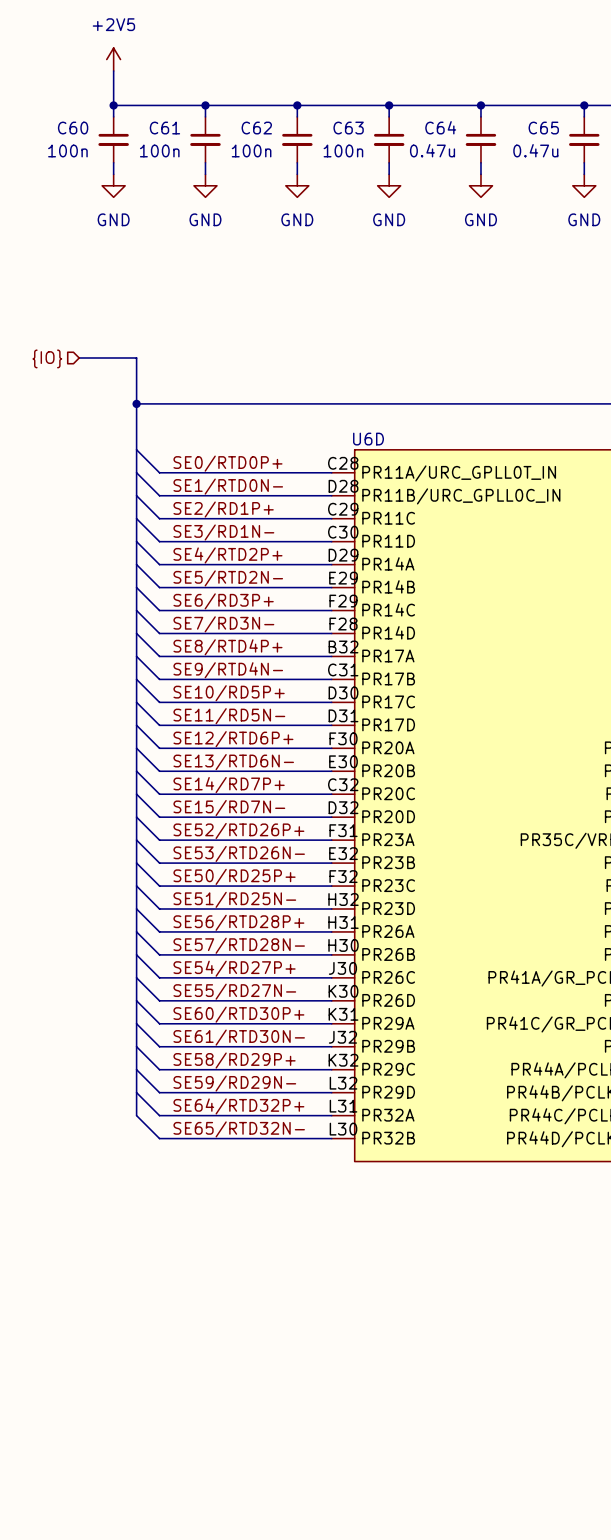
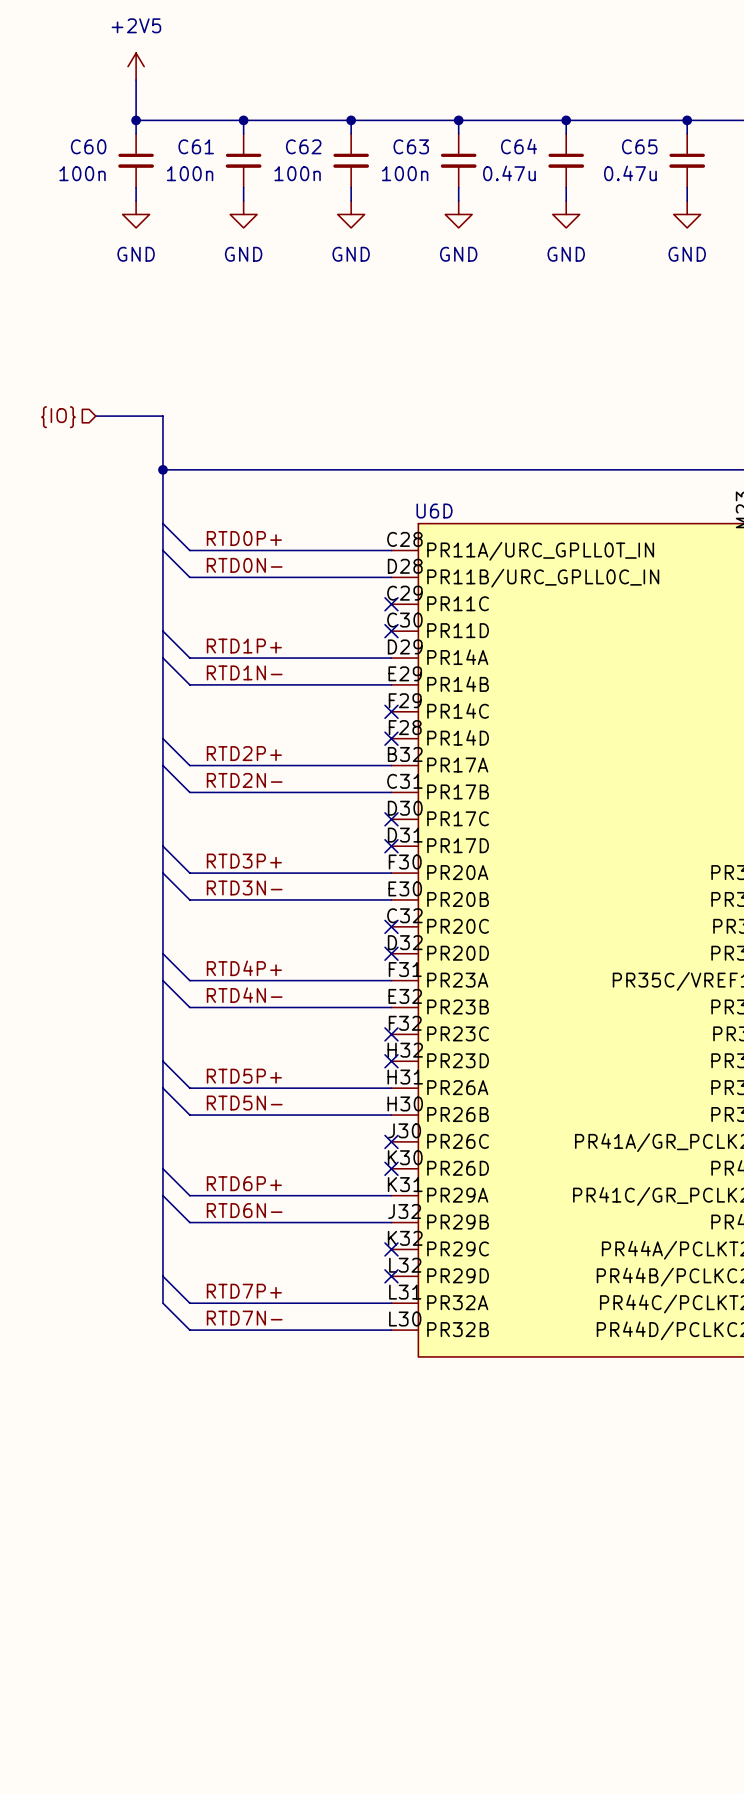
label: SE0/RTD0P+ (227, 463) -> RTD0P+ (244, 538)
label: SE1/RTD0N- (228, 486) -> RTD0N- (244, 565)
wire: (136, 495) (159, 518) (331, 518) -> none
label: SE2/RD1P+ (223, 509) -> none
wire: (136, 518) (159, 541) (331, 541) -> none
no-connect mark: none -> (391, 604)
label: SE3/RD1N- (223, 532) -> none
no-connect mark: none -> (391, 631)
label: SE4/RTD2P+ (227, 555) -> RTD1P+ (244, 646)
label: SE5/RTD2N- (228, 578) -> RTD1N- (244, 672)
wire: (136, 587) (159, 610) (331, 610) -> none
label: SE6/RD3P+ (223, 601) -> none
wire: (136, 610) (159, 633) (331, 633) -> none
no-connect mark: none -> (391, 711)
label: SE7/RD3N- (223, 624) -> none
no-connect mark: none -> (391, 738)
label: SE8/RTD4P+ (227, 647) -> RTD2P+ (244, 753)
label: SE9/RTD4N- (228, 670) -> RTD2N- (244, 780)
wire: (136, 679) (159, 702) (331, 702) -> none
label: SE10/RD5P+ (229, 693) -> none
wire: (136, 702) (159, 725) (331, 725) -> none
no-connect mark: none -> (391, 819)
label: SE11/RD5N- (229, 716) -> none
no-connect mark: none -> (391, 846)
label: SE12/RTD6P+ (233, 739) -> RTD3P+ (244, 861)
label: SE13/RTD6N- (233, 762) -> RTD3N- (244, 887)
wire: (136, 771) (159, 794) (331, 794) -> none
label: SE14/RD7P+ (229, 785) -> none
wire: (136, 794) (159, 817) (331, 817) -> none
no-connect mark: none -> (391, 926)
label: SE15/RD7N- (229, 808) -> none
no-connect mark: none -> (391, 953)
label: SE52/RTD26P+ (238, 830) -> RTD4P+ (244, 968)
label: SE53/RTD26N- (239, 853) -> RTD4N- (244, 995)
wire: (136, 863) (159, 886) (331, 886) -> none
label: SE50/RD25P+ (234, 876) -> none
wire: (136, 886) (159, 909) (331, 909) -> none
no-connect mark: none -> (391, 1034)
label: SE51/RD25N- (234, 899) -> none
no-connect mark: none -> (391, 1061)
label: SE56/RTD28P+ (238, 922) -> RTD5P+ (244, 1076)
label: SE57/RTD28N- (239, 945) -> RTD5N- (244, 1103)
wire: (136, 954) (159, 977) (331, 977) -> none
label: SE54/RD27P+ (234, 968) -> none
wire: (136, 977) (159, 1000) (331, 1000) -> none
no-connect mark: none -> (391, 1141)
label: SE55/RD27N- (234, 991) -> none
no-connect mark: none -> (391, 1168)
label: SE60/RTD30P+ (238, 1014) -> RTD6P+ (244, 1183)
label: SE61/RTD30N- (239, 1037) -> RTD6N- (244, 1210)
wire: (136, 1046) (159, 1069) (331, 1069) -> none
label: SE58/RD29P+ (234, 1060) -> none
wire: (136, 1069) (159, 1092) (331, 1092) -> none
no-connect mark: none -> (391, 1249)
label: SE59/RD29N- (234, 1083) -> none
no-connect mark: none -> (391, 1276)
label: SE64/RTD32P+ (238, 1106) -> RTD7P+ (244, 1291)
label: SE65/RTD32N- (239, 1129) -> RTD7N- (244, 1318)

